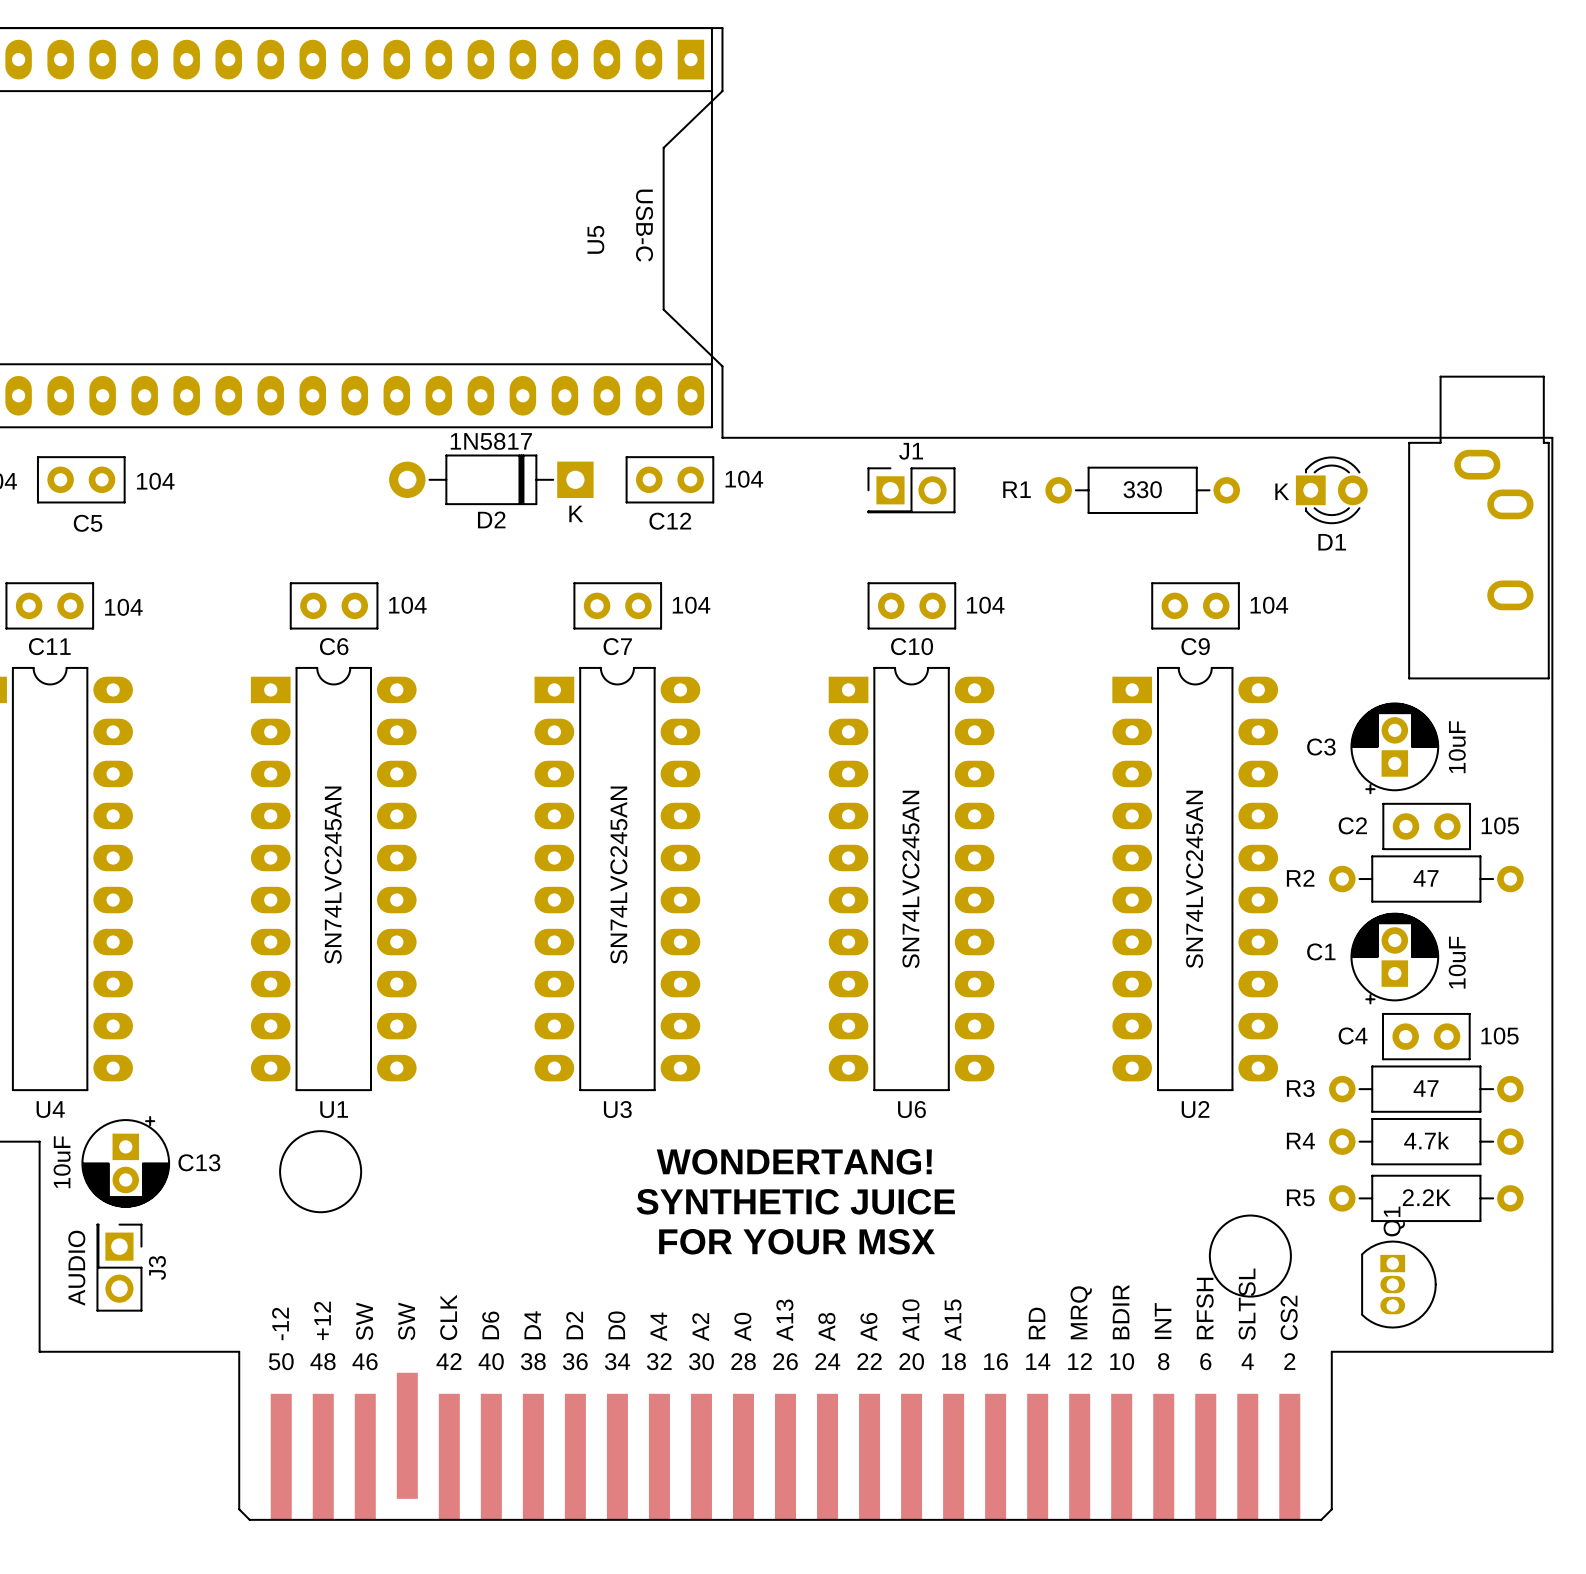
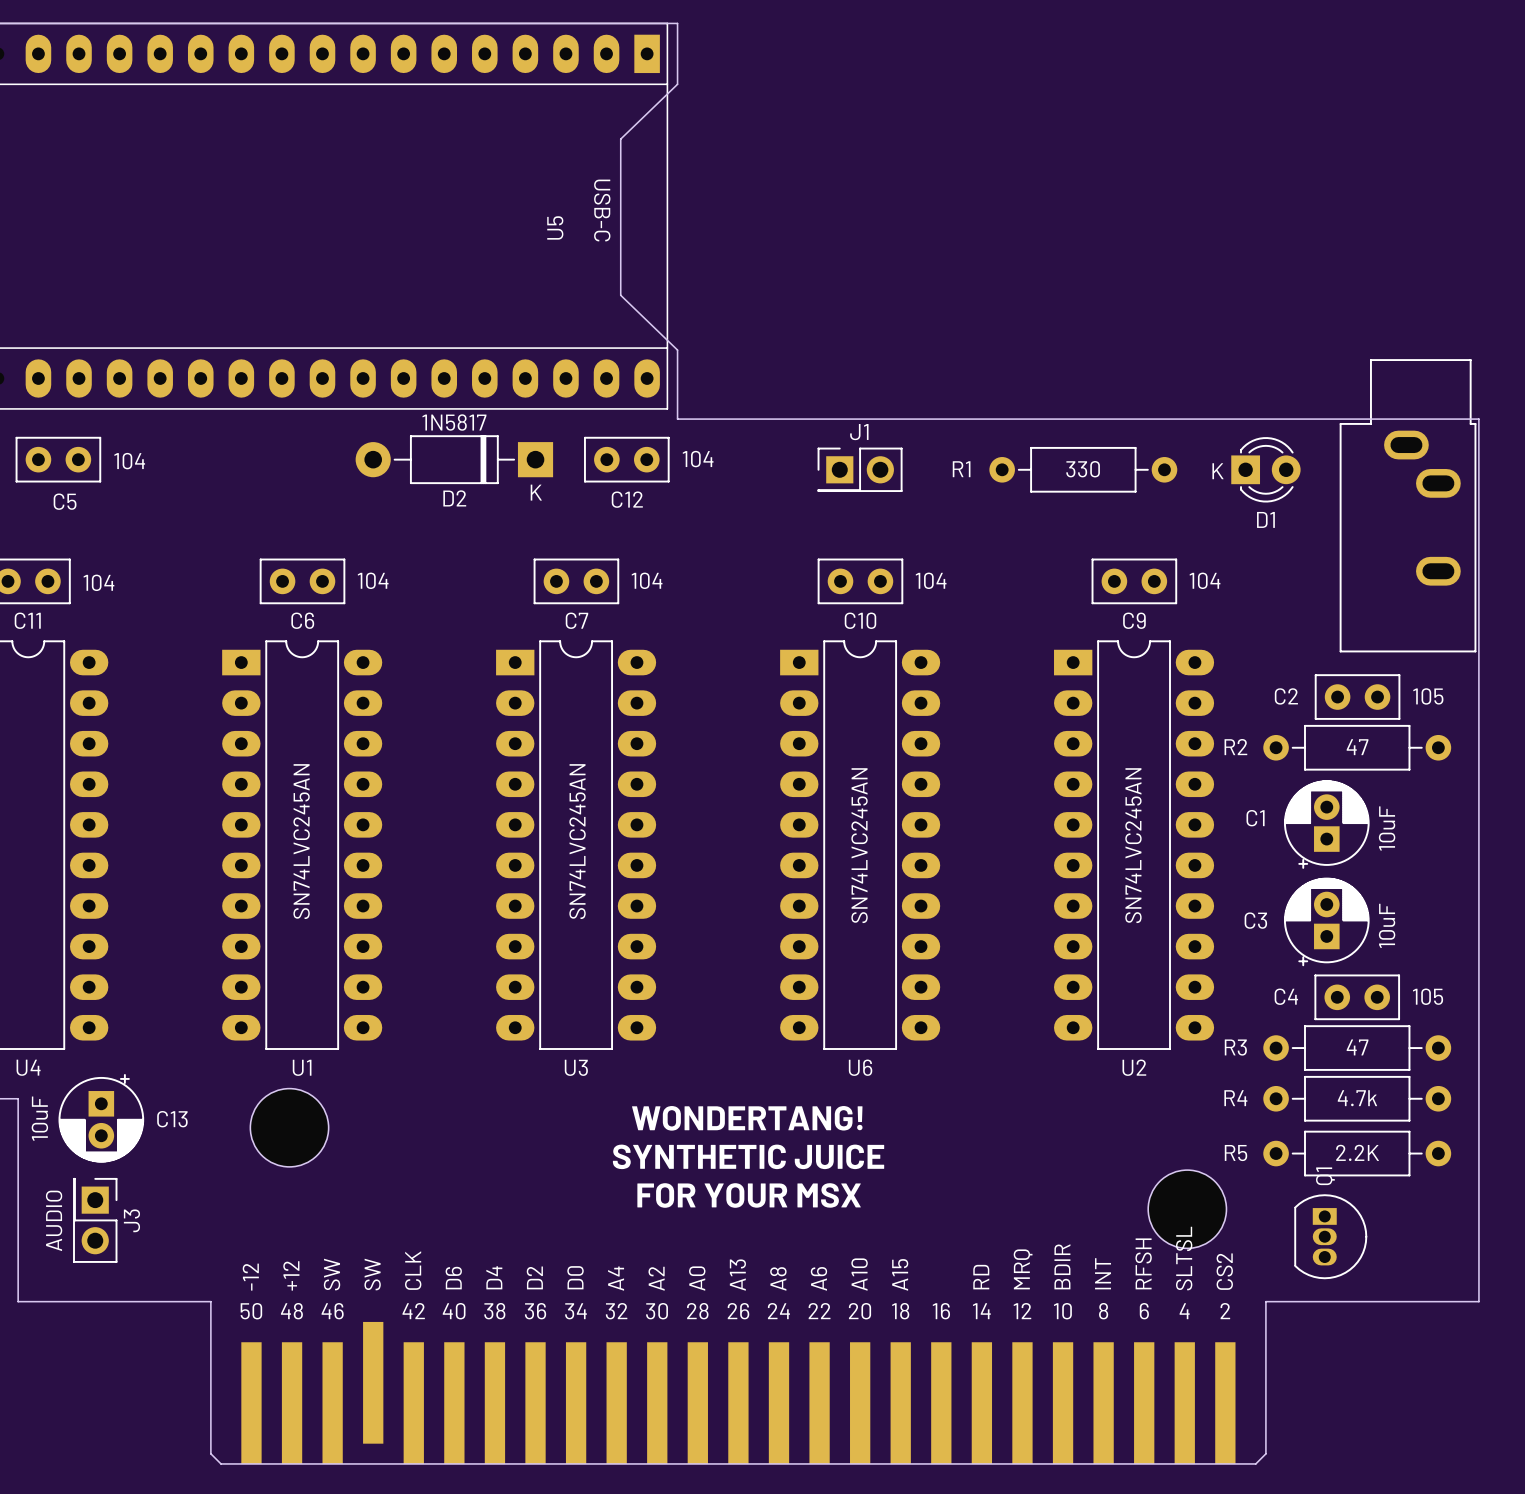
C3: 10uF (1394, 748) -> none
C2 position: (1426, 826) -> (1357, 697)
C1: none -> 10uF (1326, 824)
R2 position: (1426, 879) -> (1357, 747)
C1 name: C1 (1321, 951) -> C3 (1255, 920)

